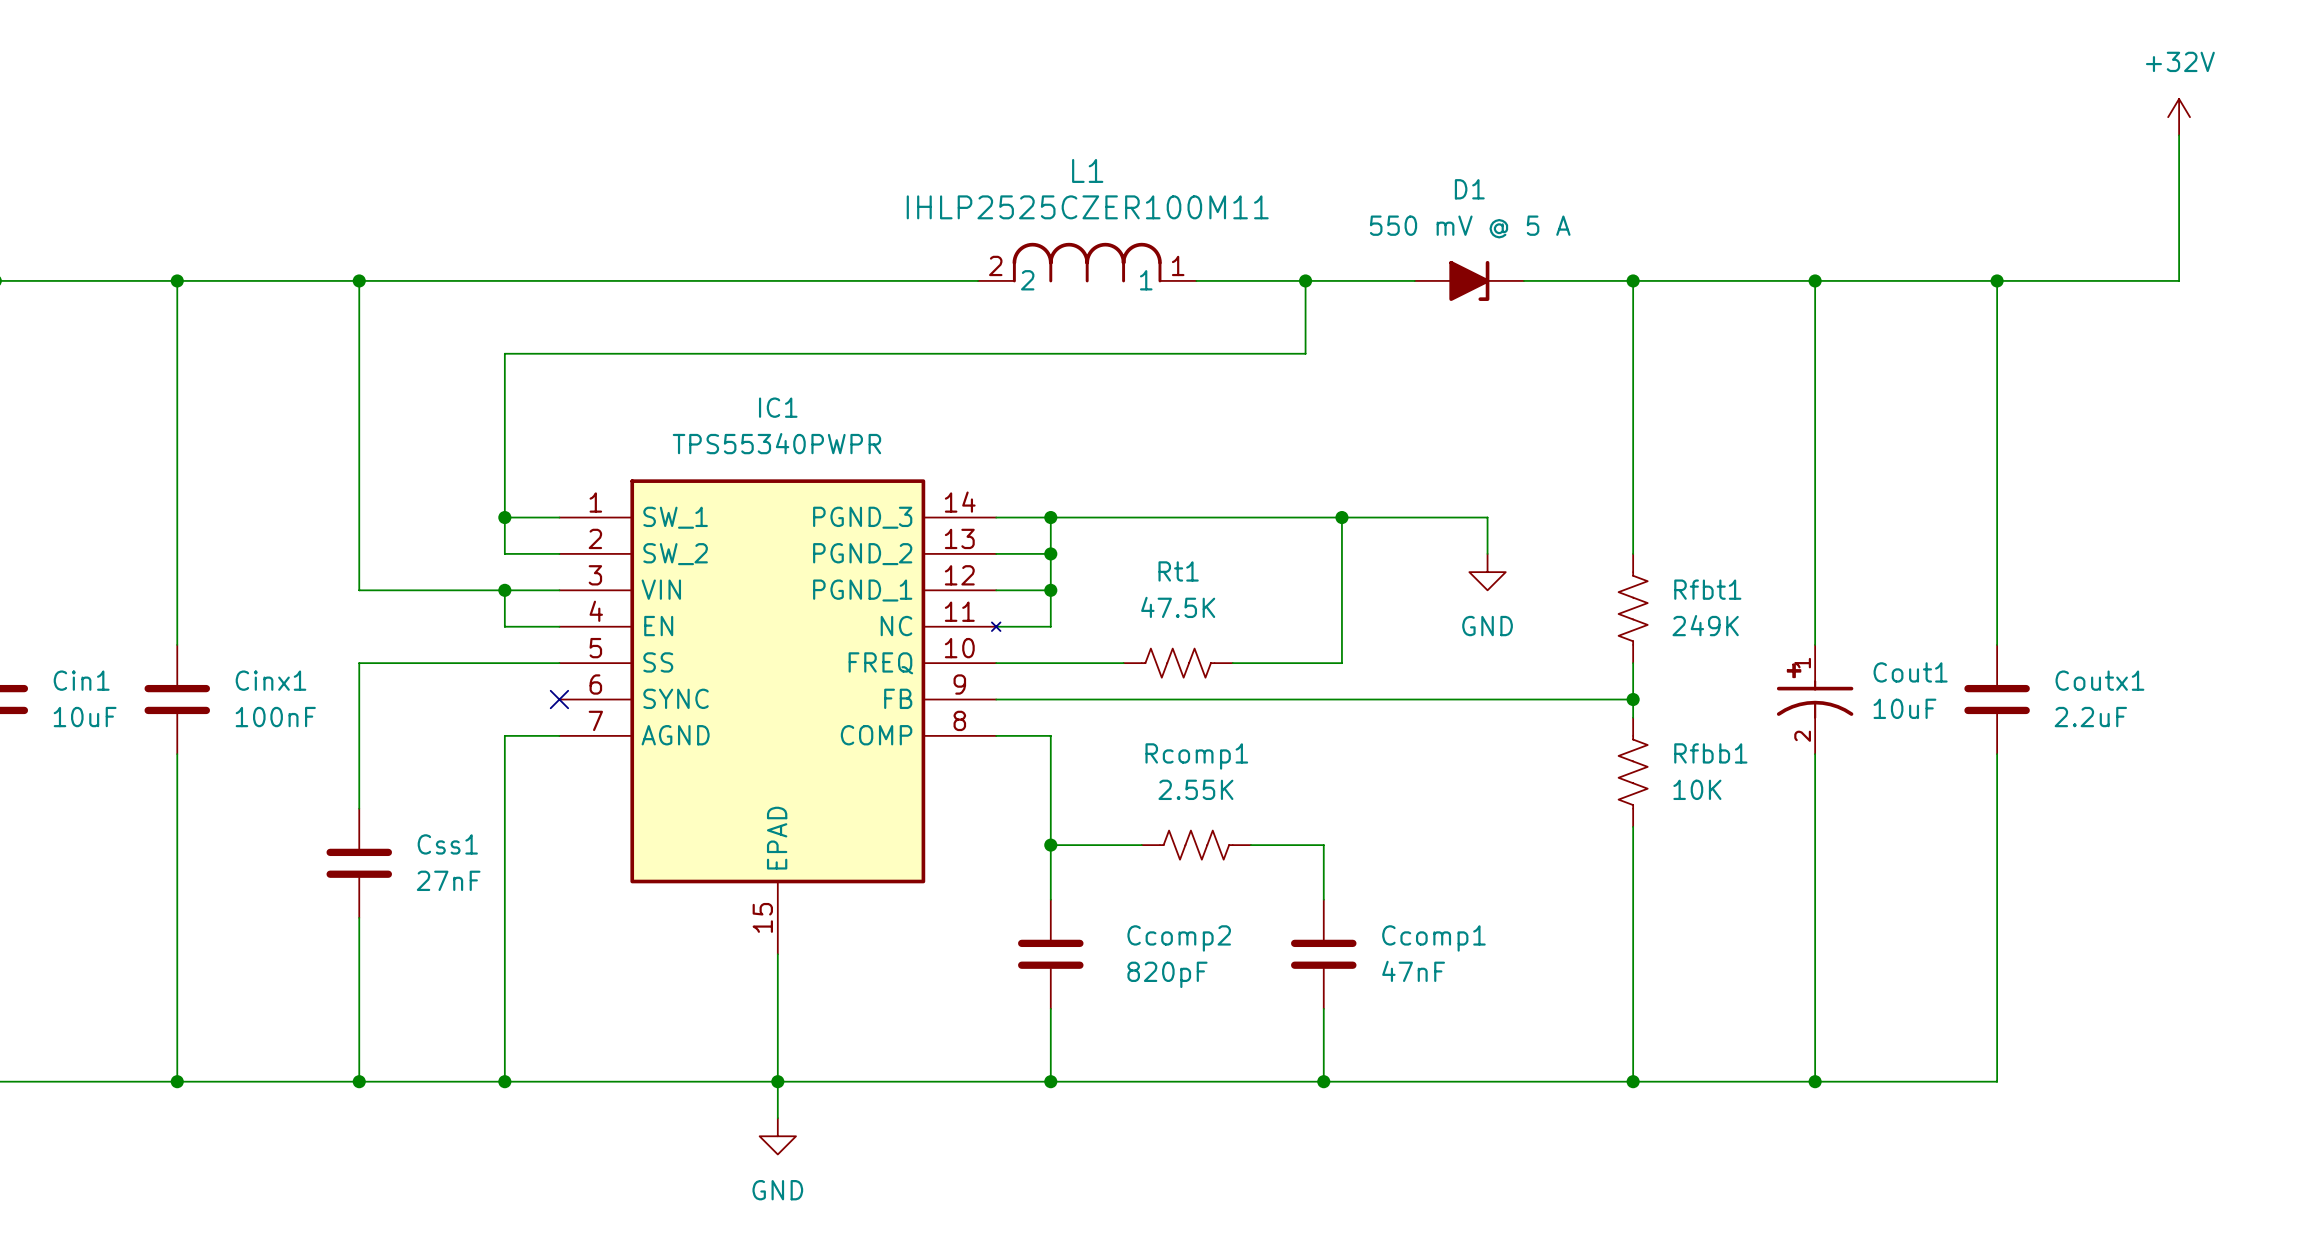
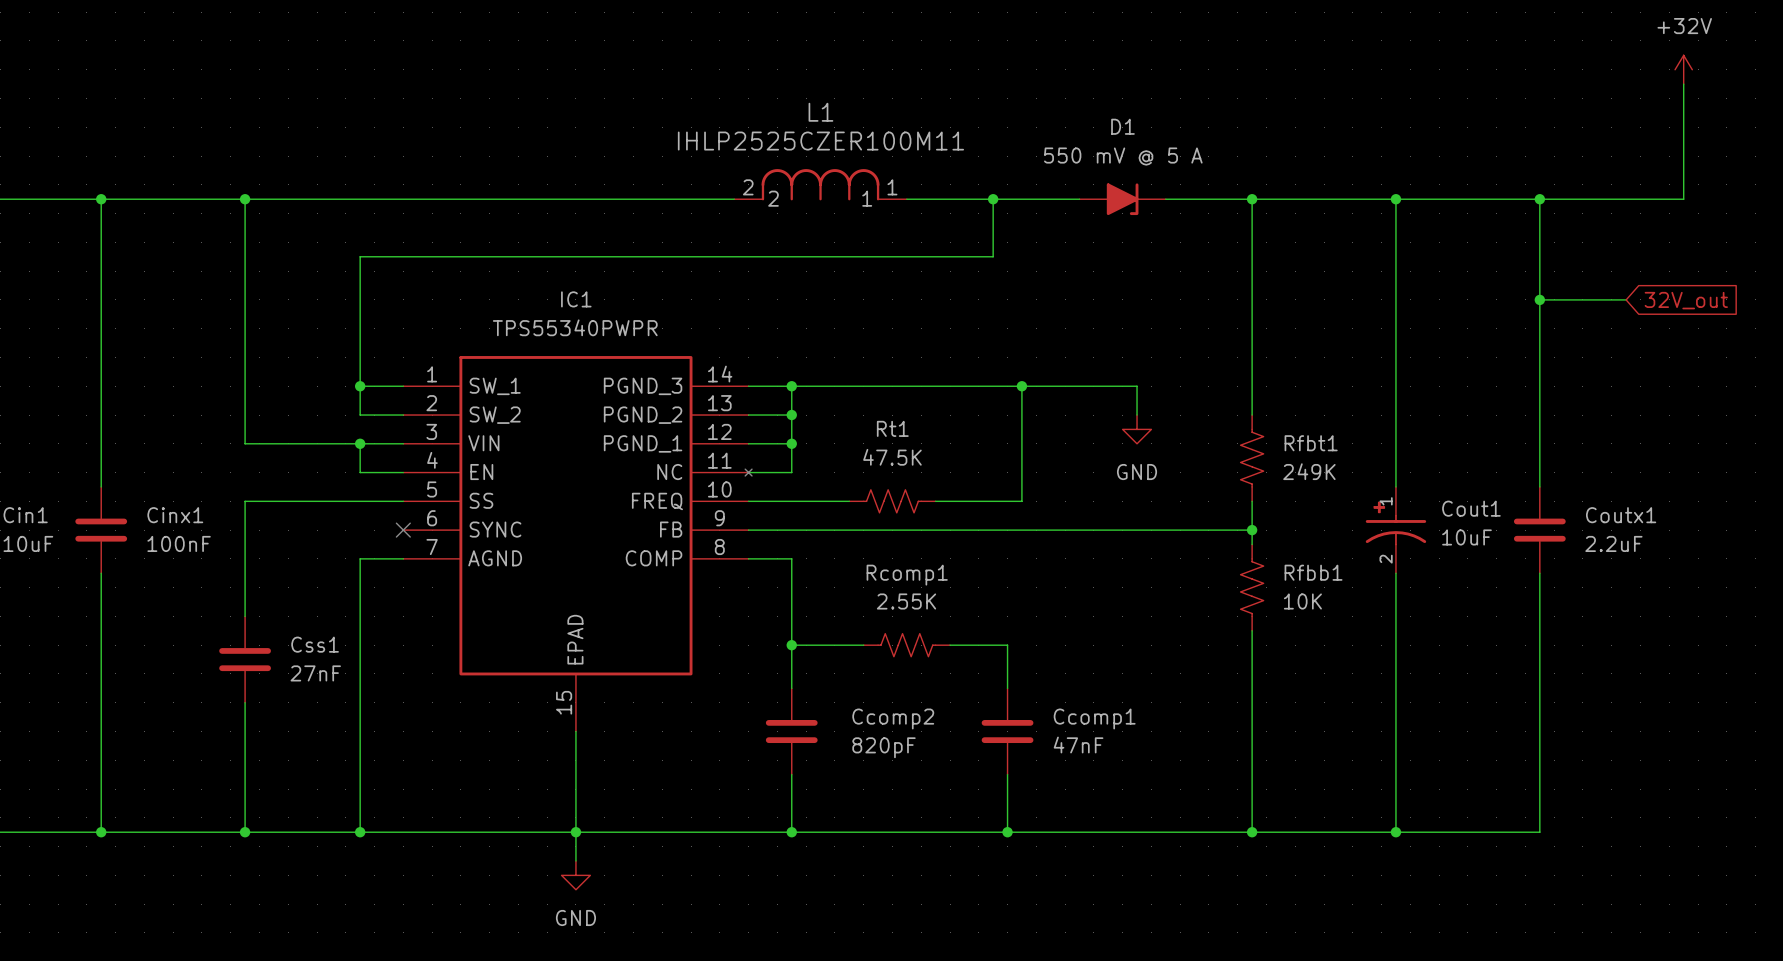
wire: none -> (1539, 299) (1626, 299)
junction: none -> (1539, 299)
global label: none -> 32V_out (1686, 300)

